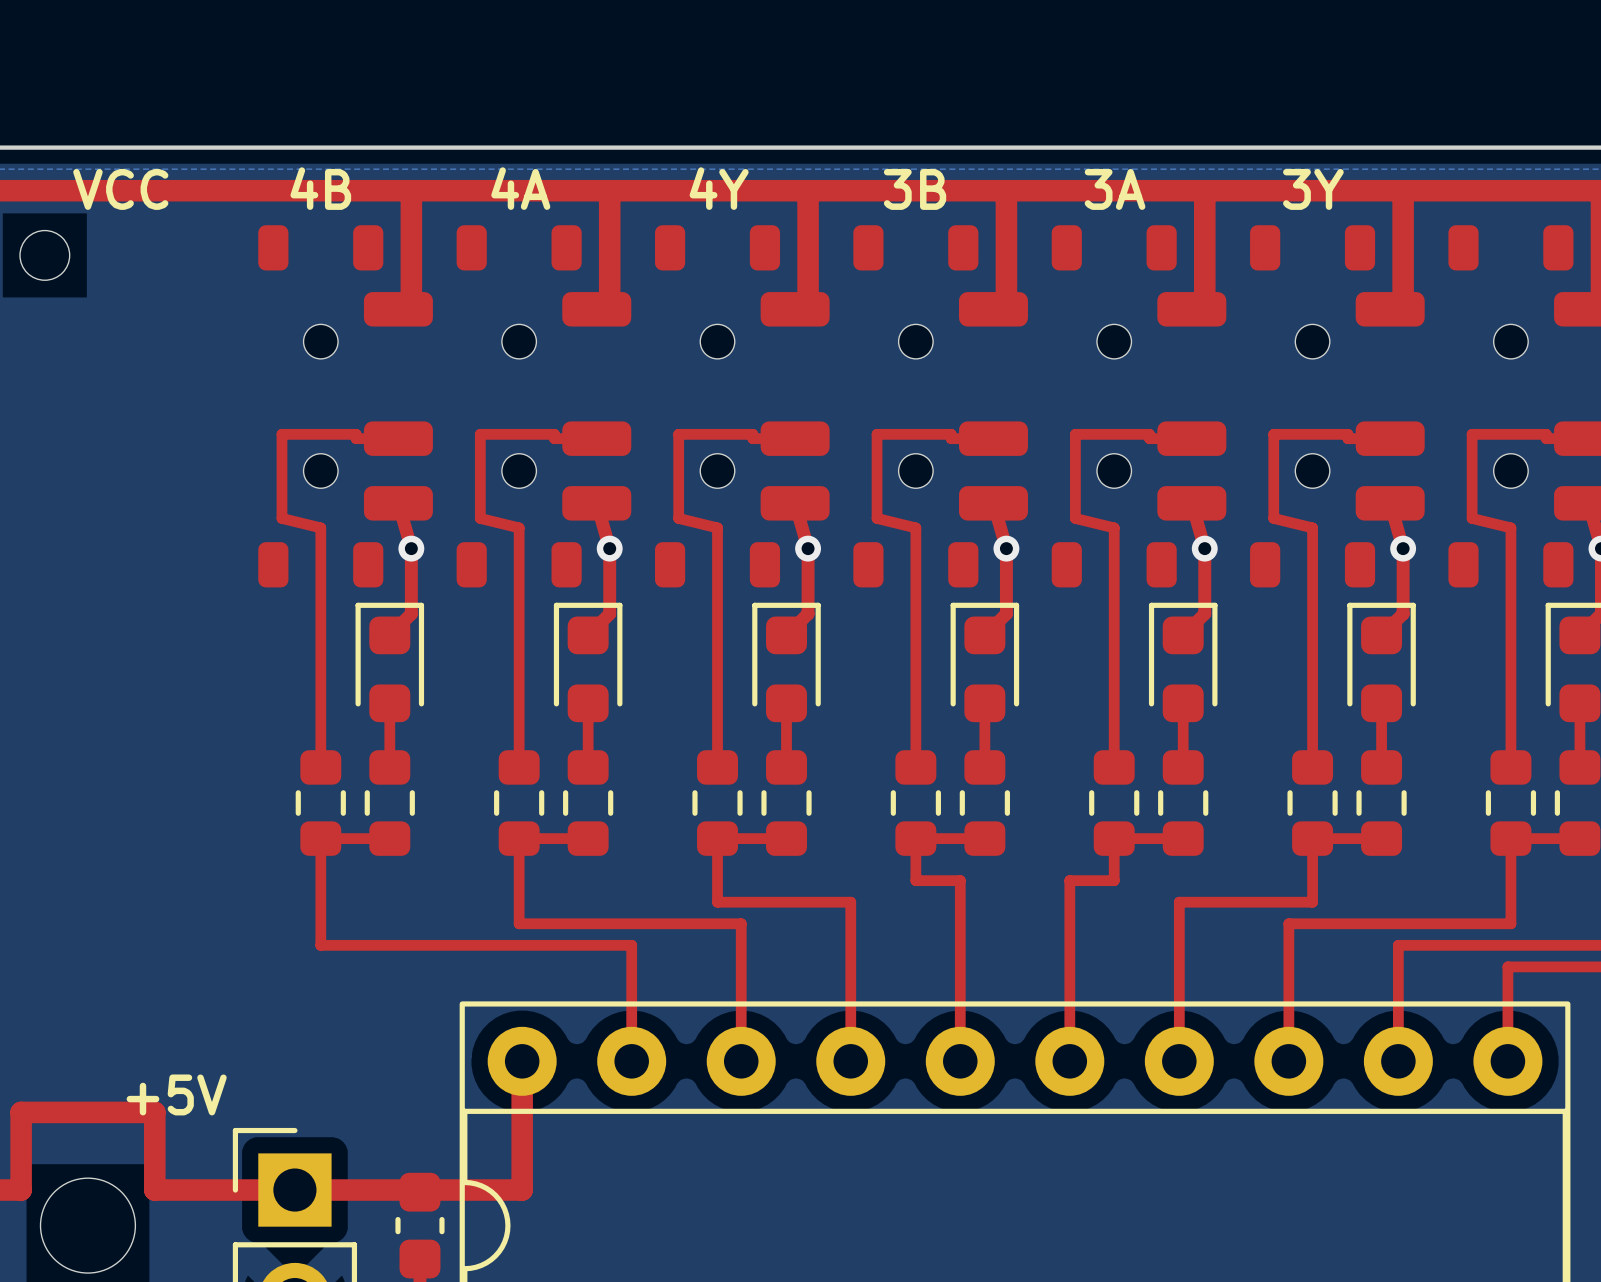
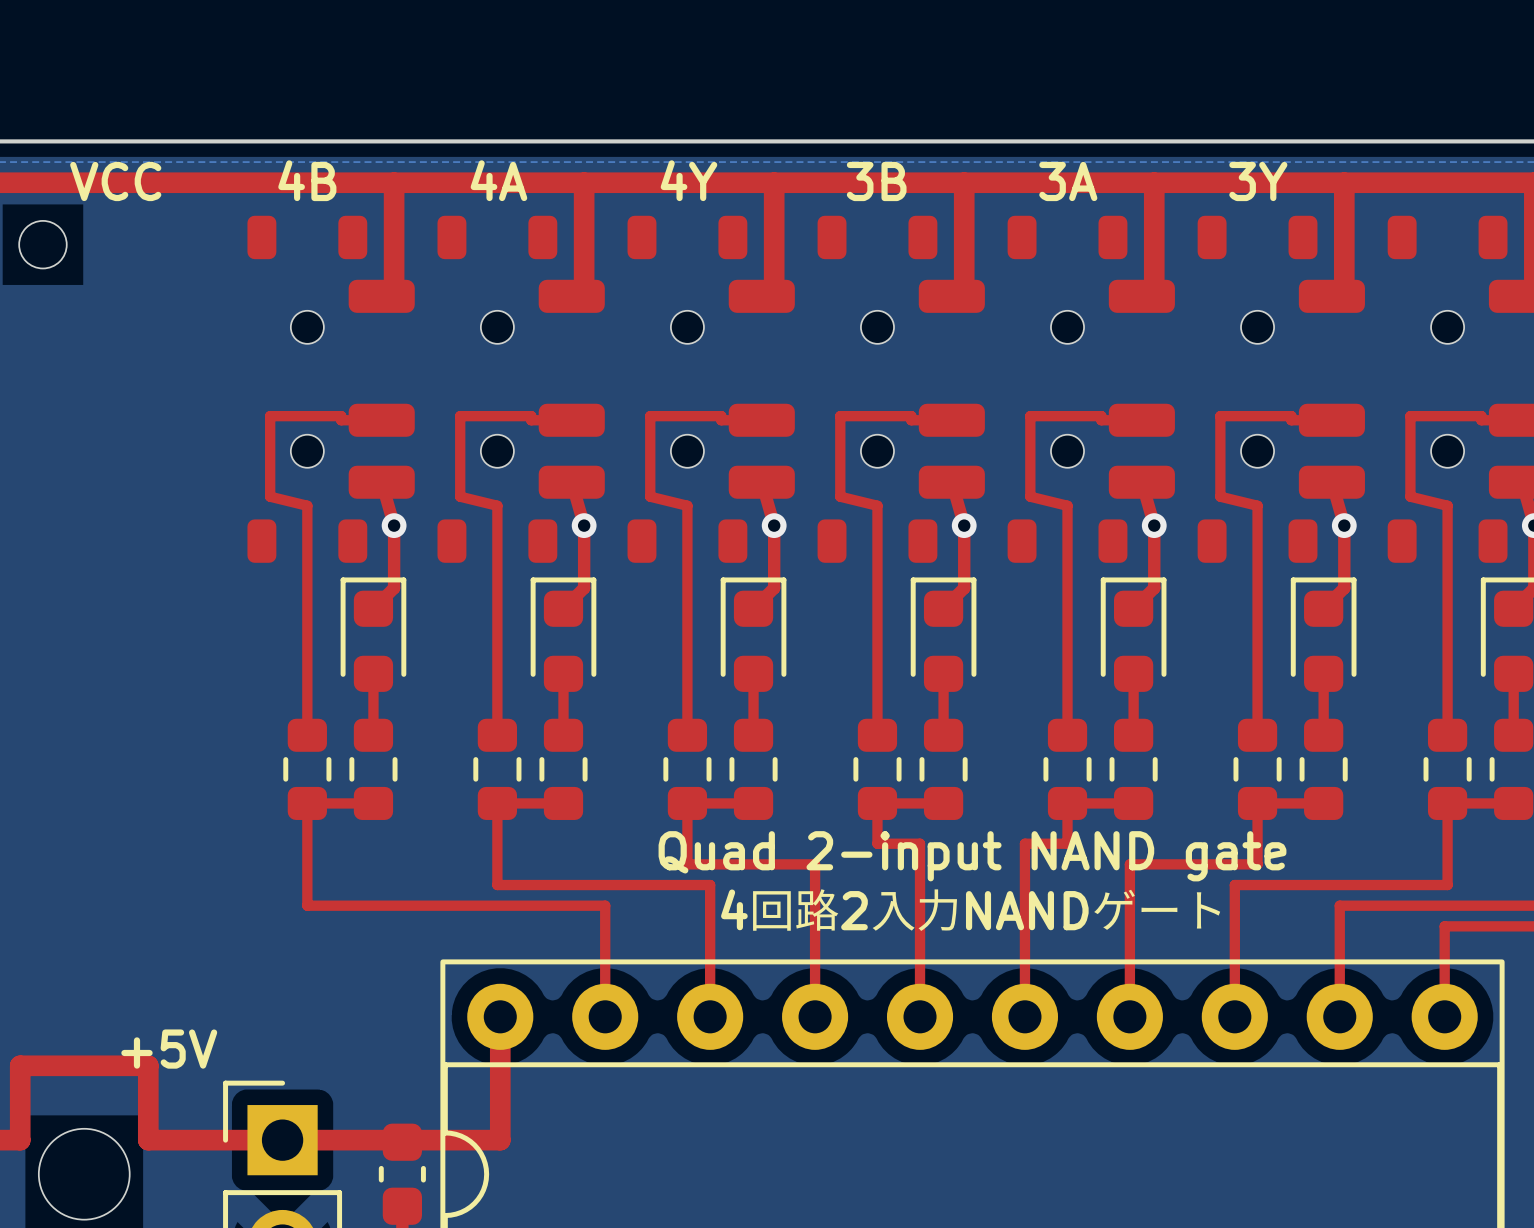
text: none -> Quad 2-input NAND gate (972, 856)
text: none -> 4回路2入力NANDゲート (972, 910)

